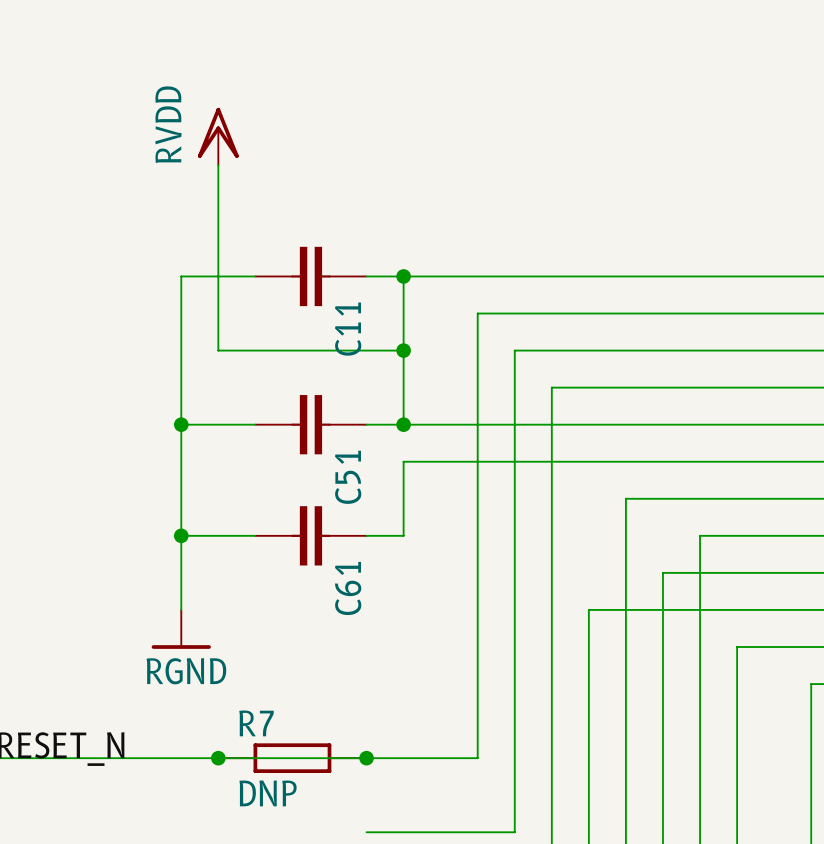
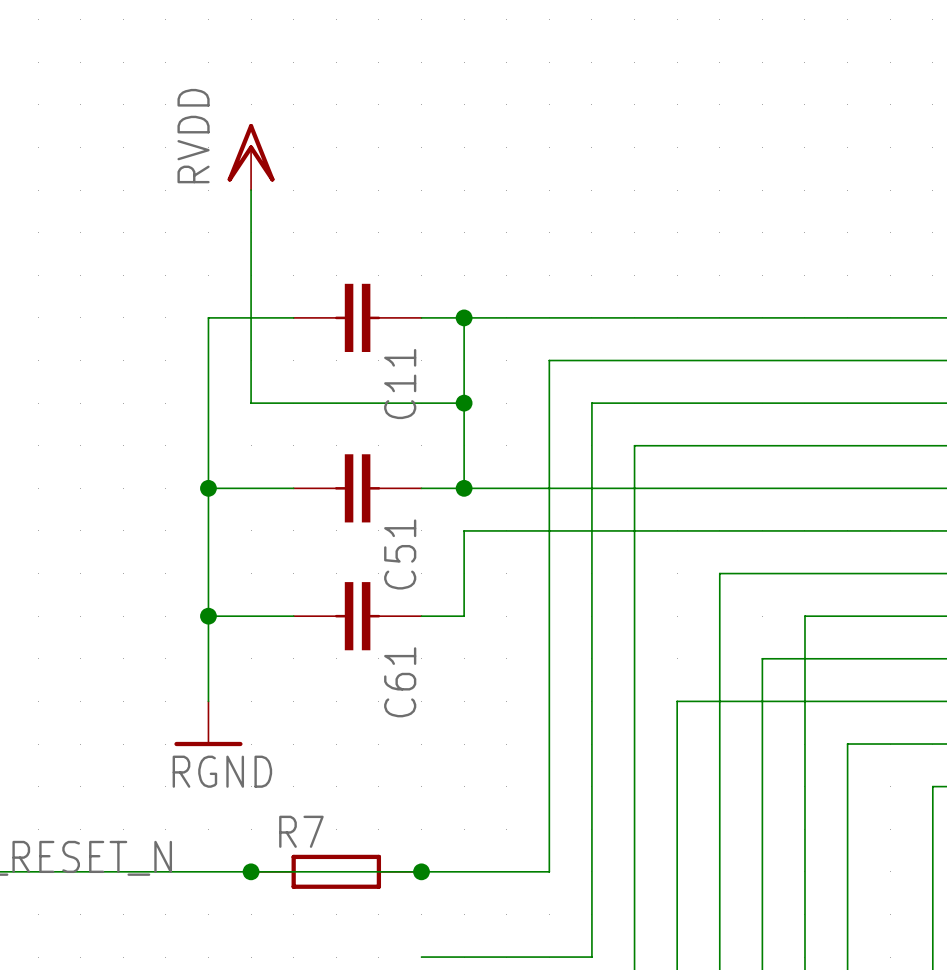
R7 value: DNP (268, 793) -> none

